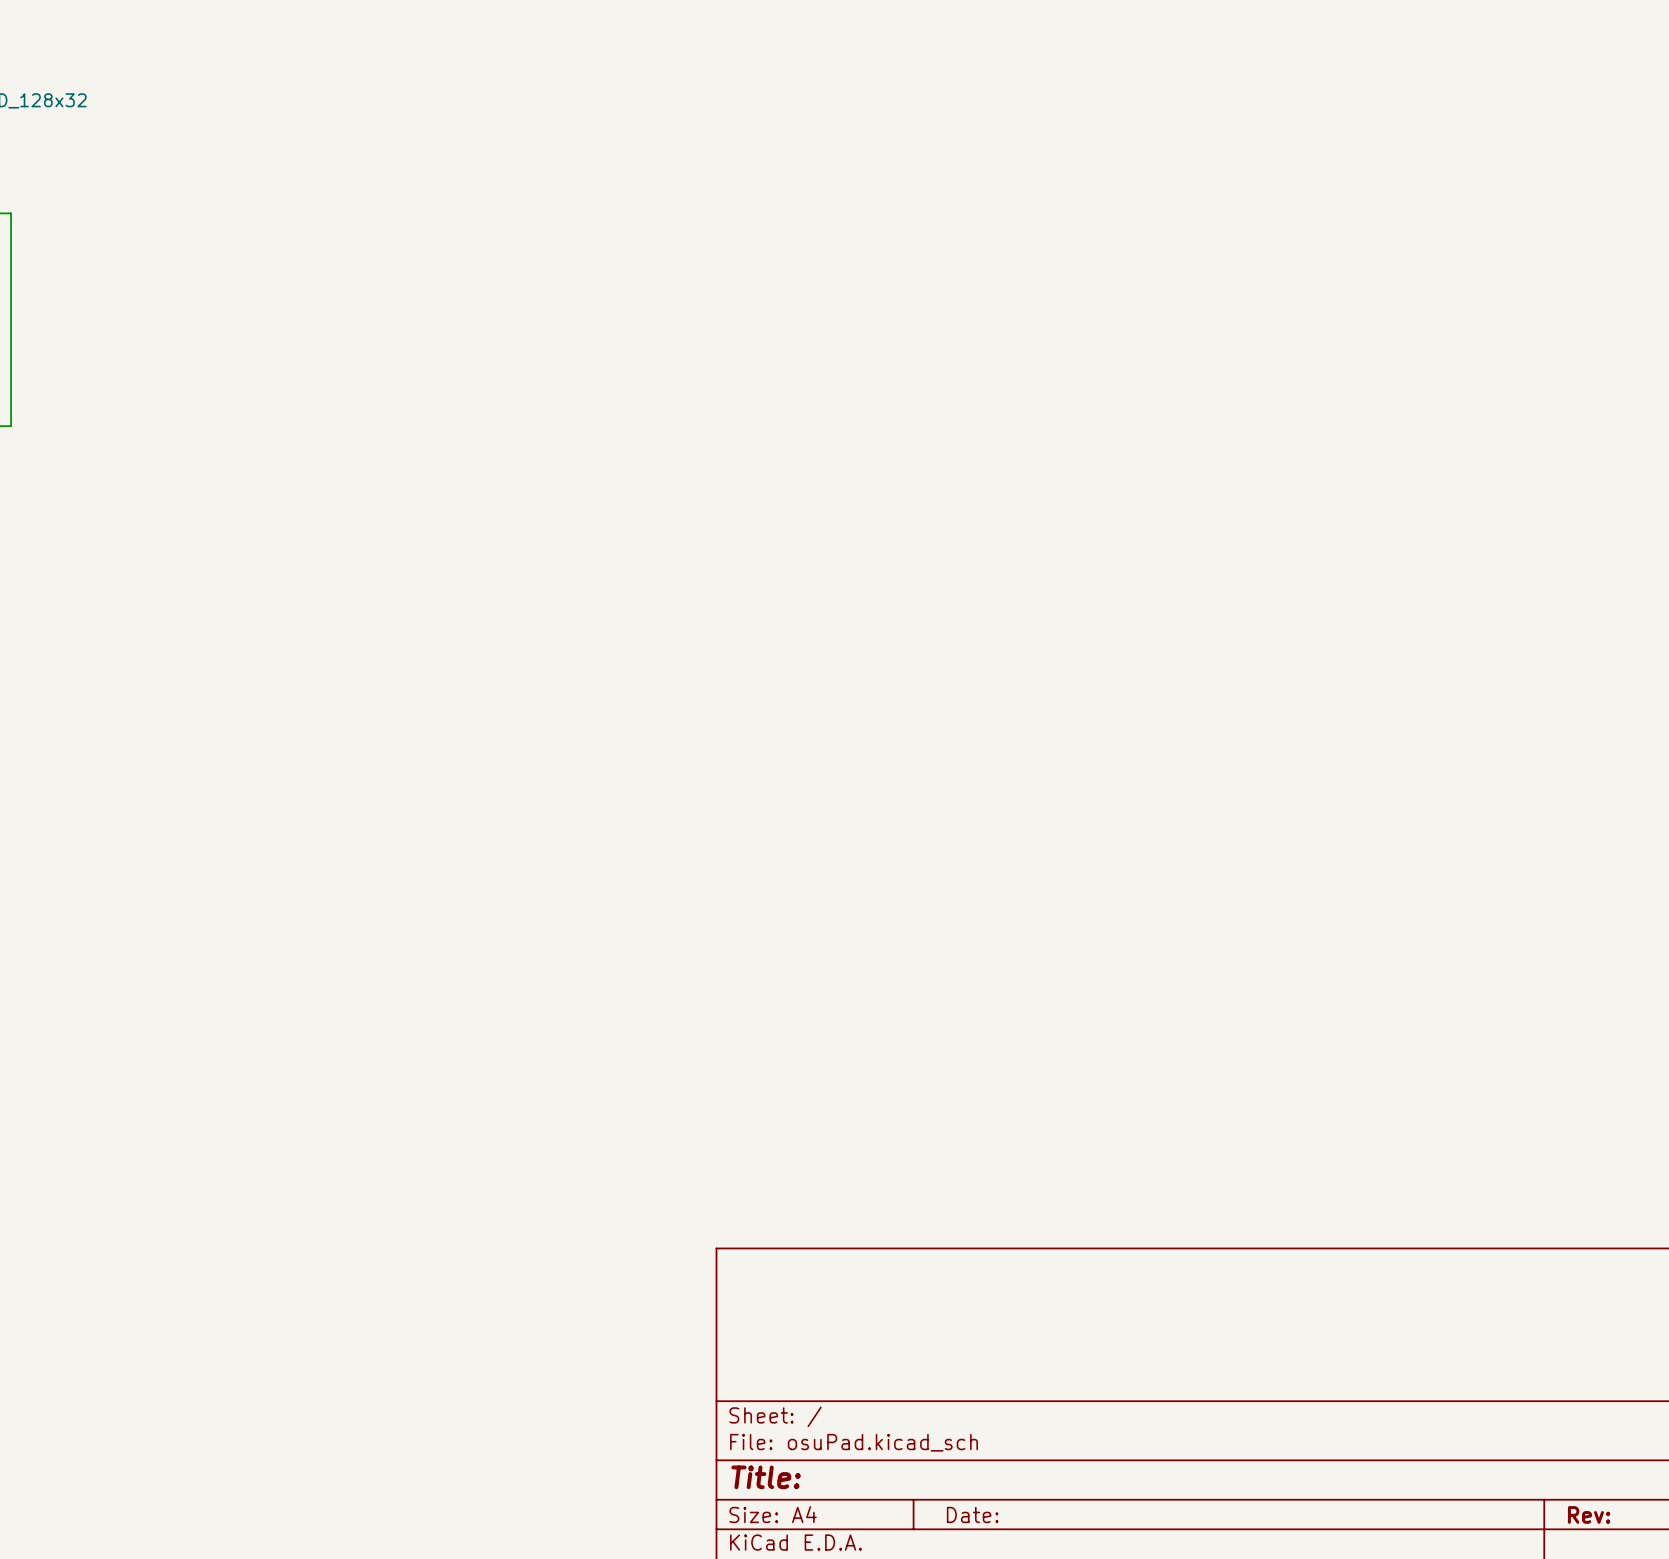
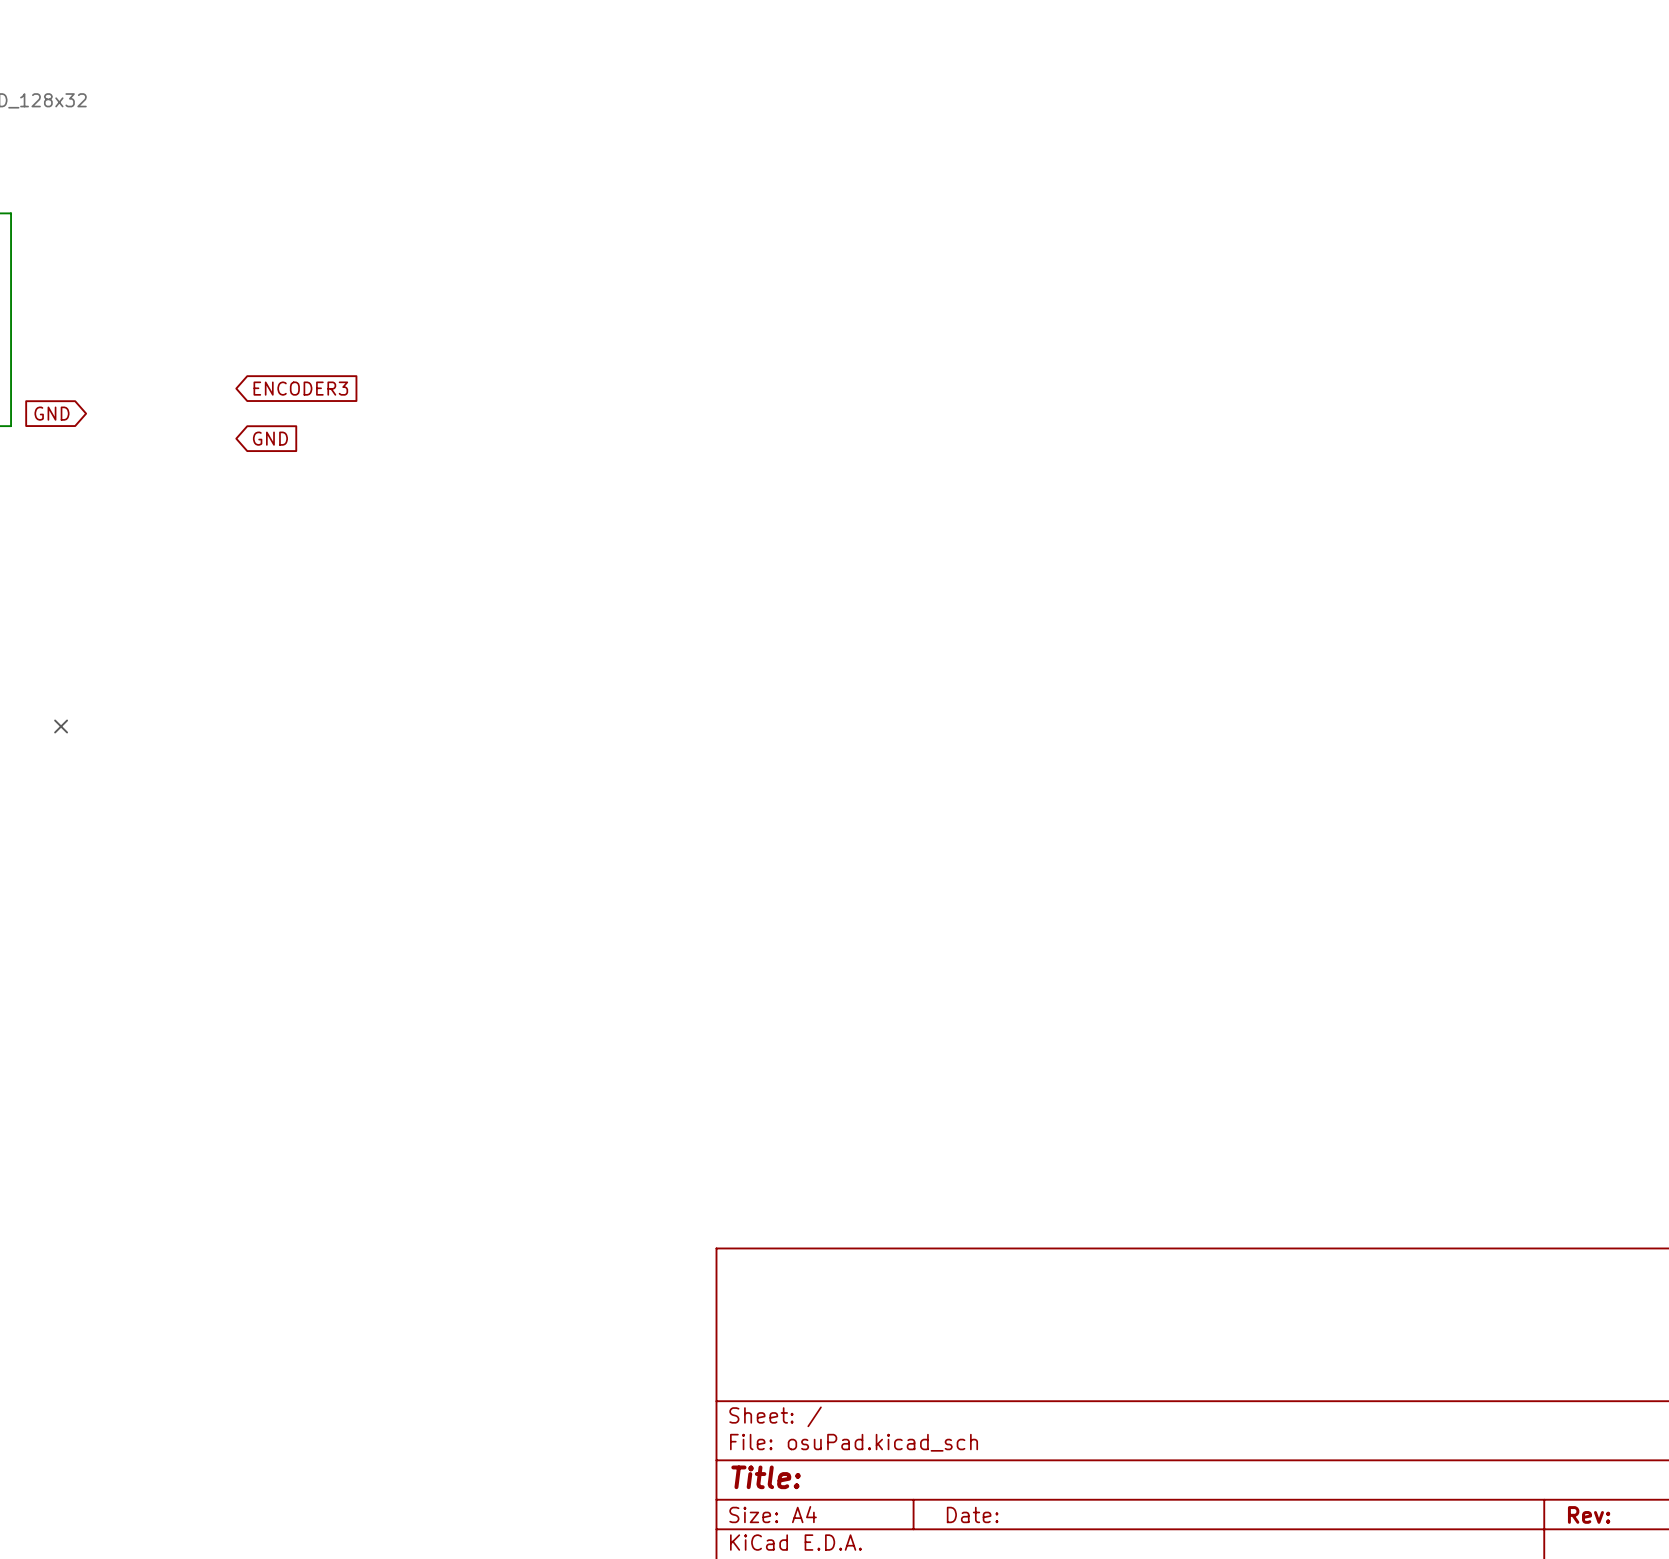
global label: none -> ENCODER3 (300, 388)
global label: none -> GND (51, 413)
global label: none -> GND (270, 438)
no-connect mark: none -> (61, 726)

